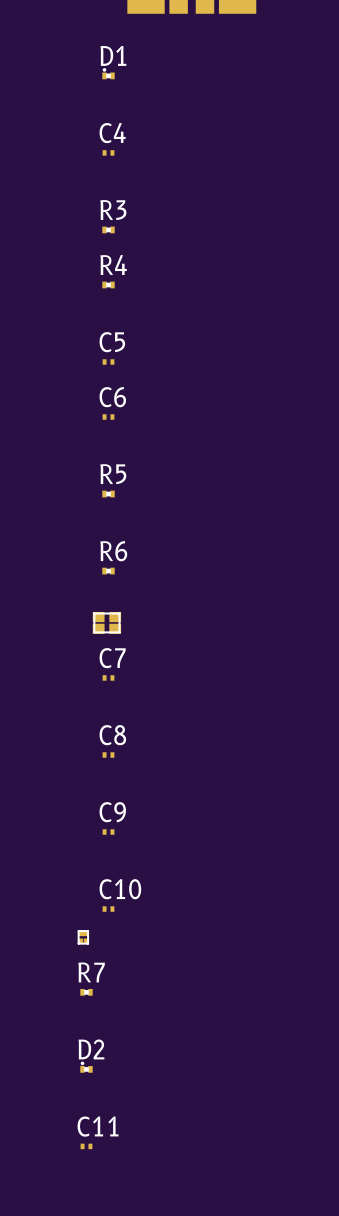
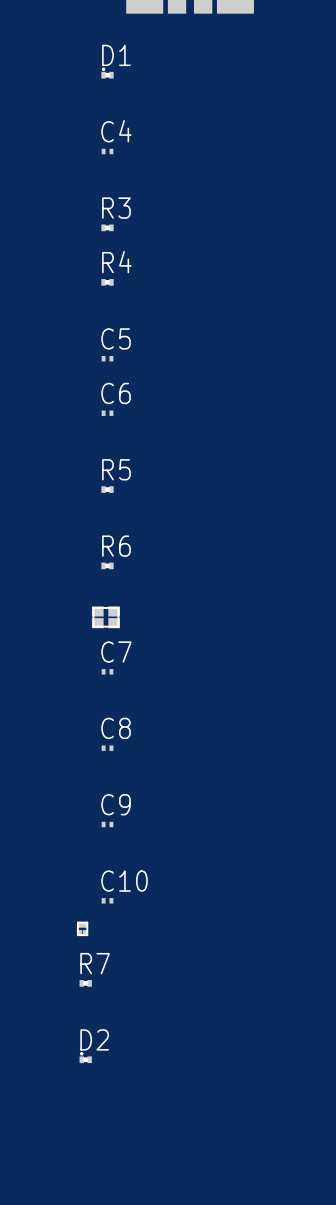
C11: (86, 1146) -> none

